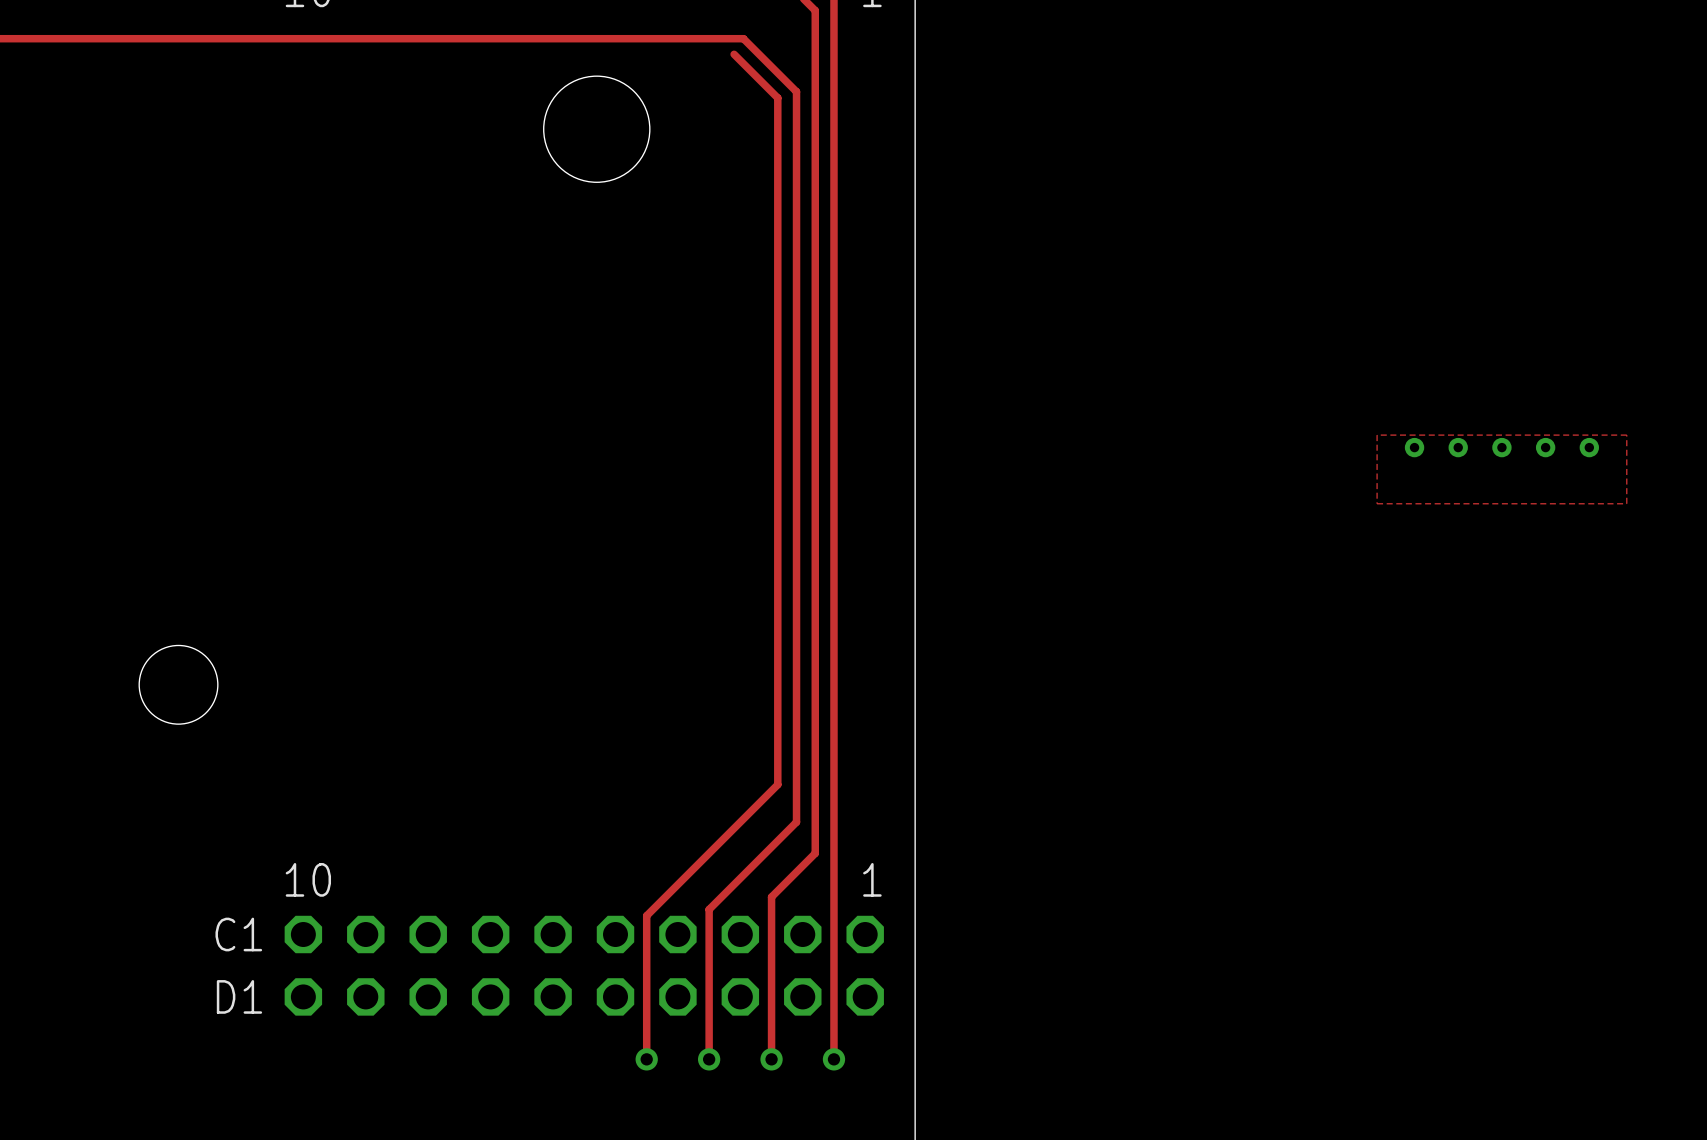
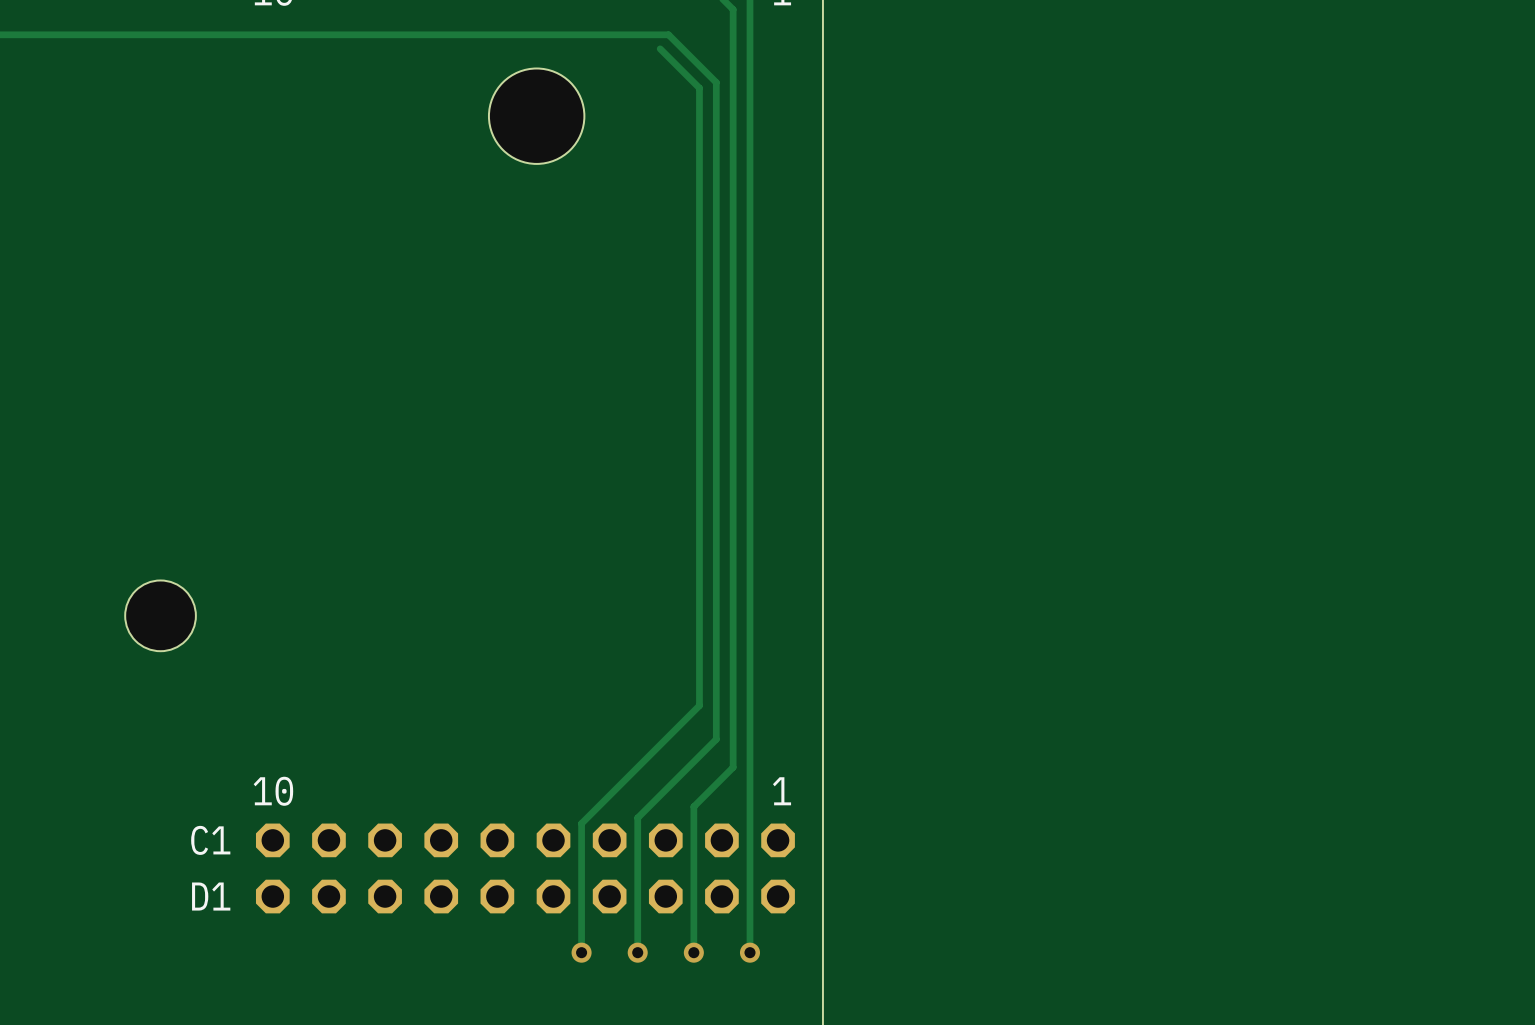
zone outline: (1377, 435) (1626, 435) (1626, 503) (1377, 503) (1377, 435) -> none
via: (1414, 447) -> none
via: (1458, 447) -> none
via: (1501, 447) -> none
via: (1545, 447) -> none
via: (1589, 447) -> none

